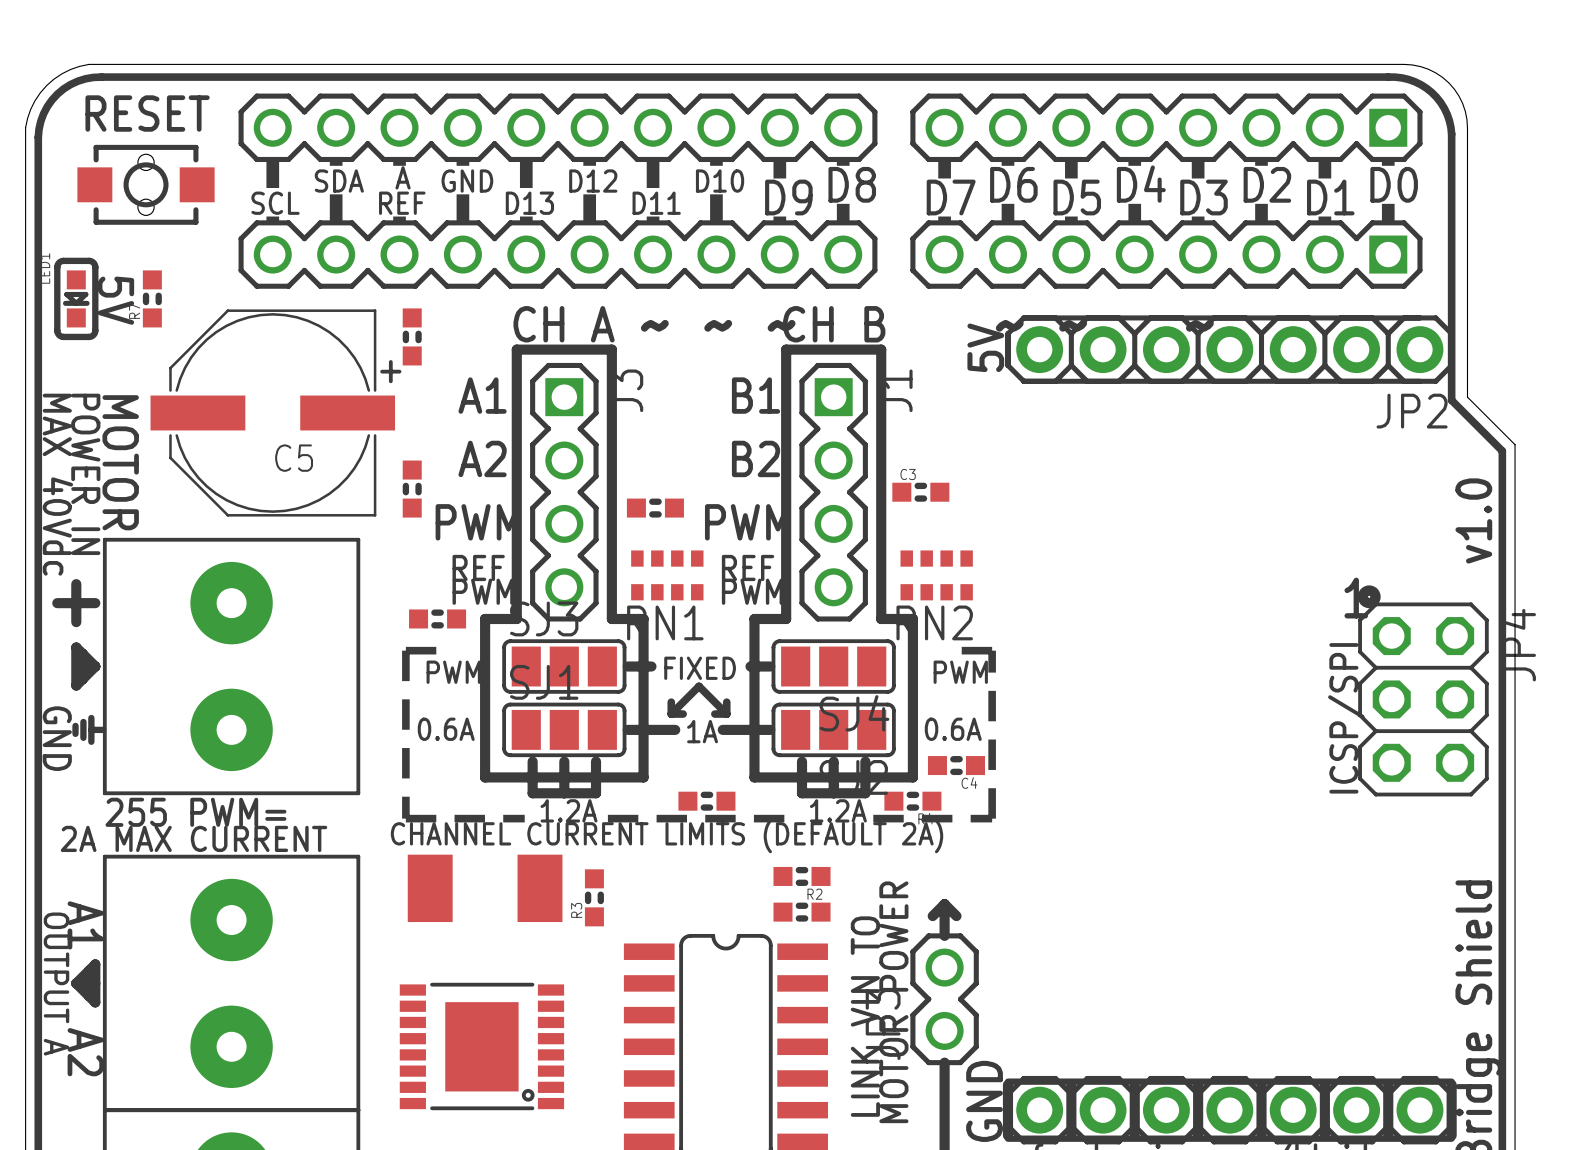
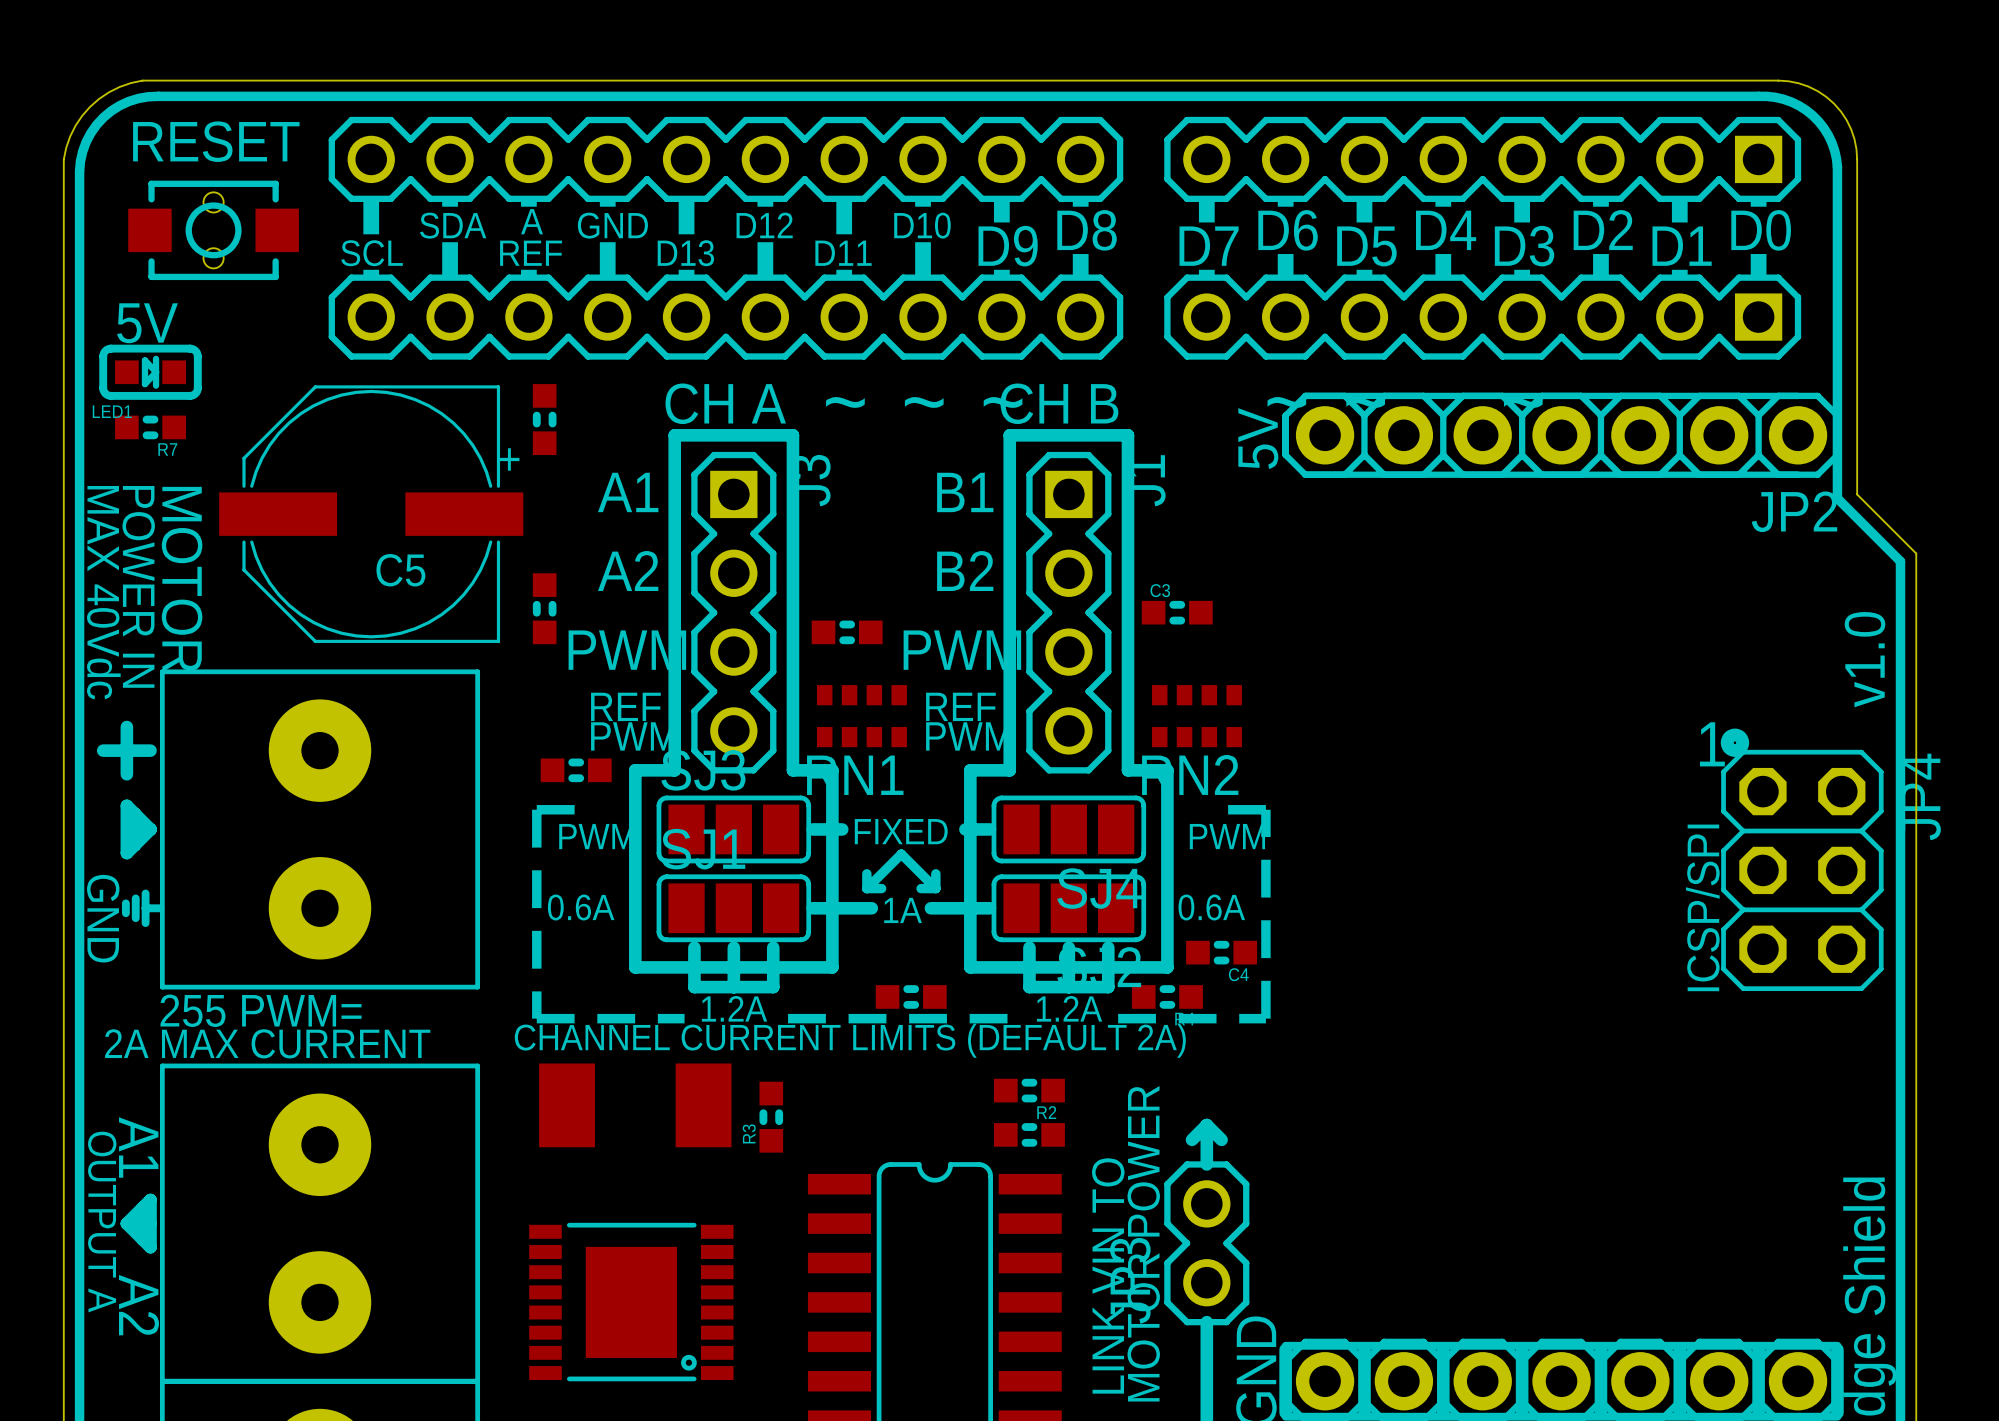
line: (57, 286) (57, 266) (60, 261) (89, 260) (94, 264) (94, 334) (88, 336) (60, 336) (57, 331) (57, 311) -> (103, 356) (105, 350) (111, 348) (190, 348) (195, 350) (197, 356) (197, 389) (191, 395) (110, 395) (105, 393) (103, 388)
LED1 rotation: 0° (76, 298) -> 90° counterclockwise (150, 372)
R7 rotation: 0° (152, 298) -> 90° clockwise (150, 427)
R7 position: (152, 298) -> (150, 427)
text rotation: 0° (115, 300) -> 90° counterclockwise (147, 323)

